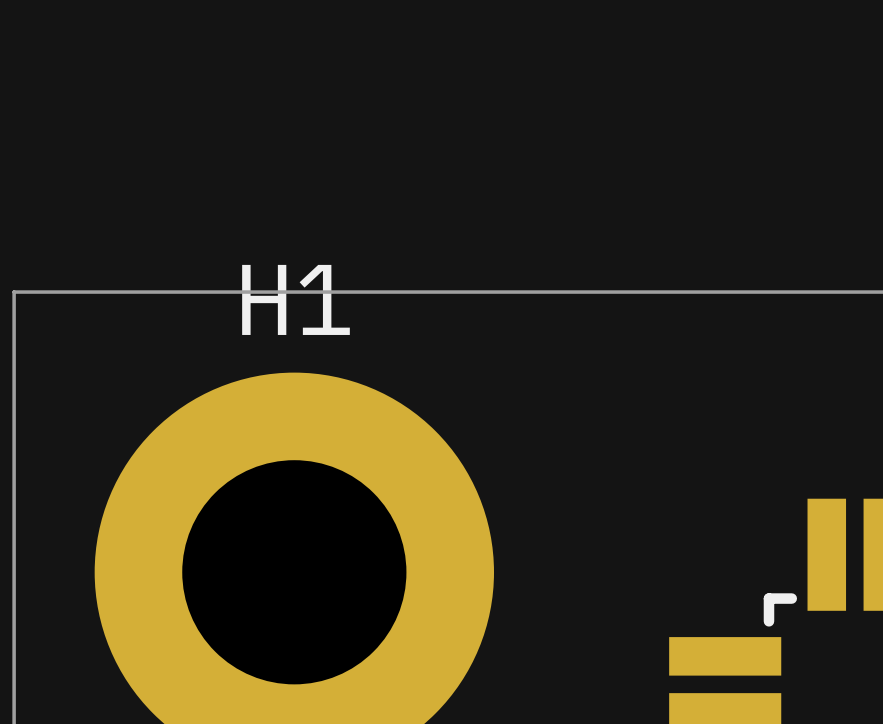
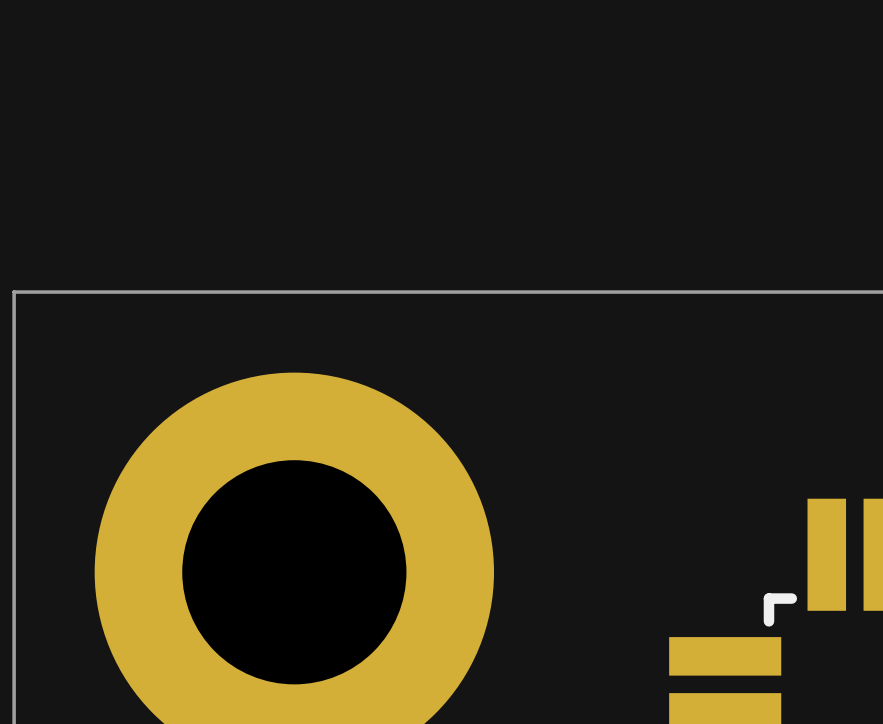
H1 name: H1 (295, 299) -> none

